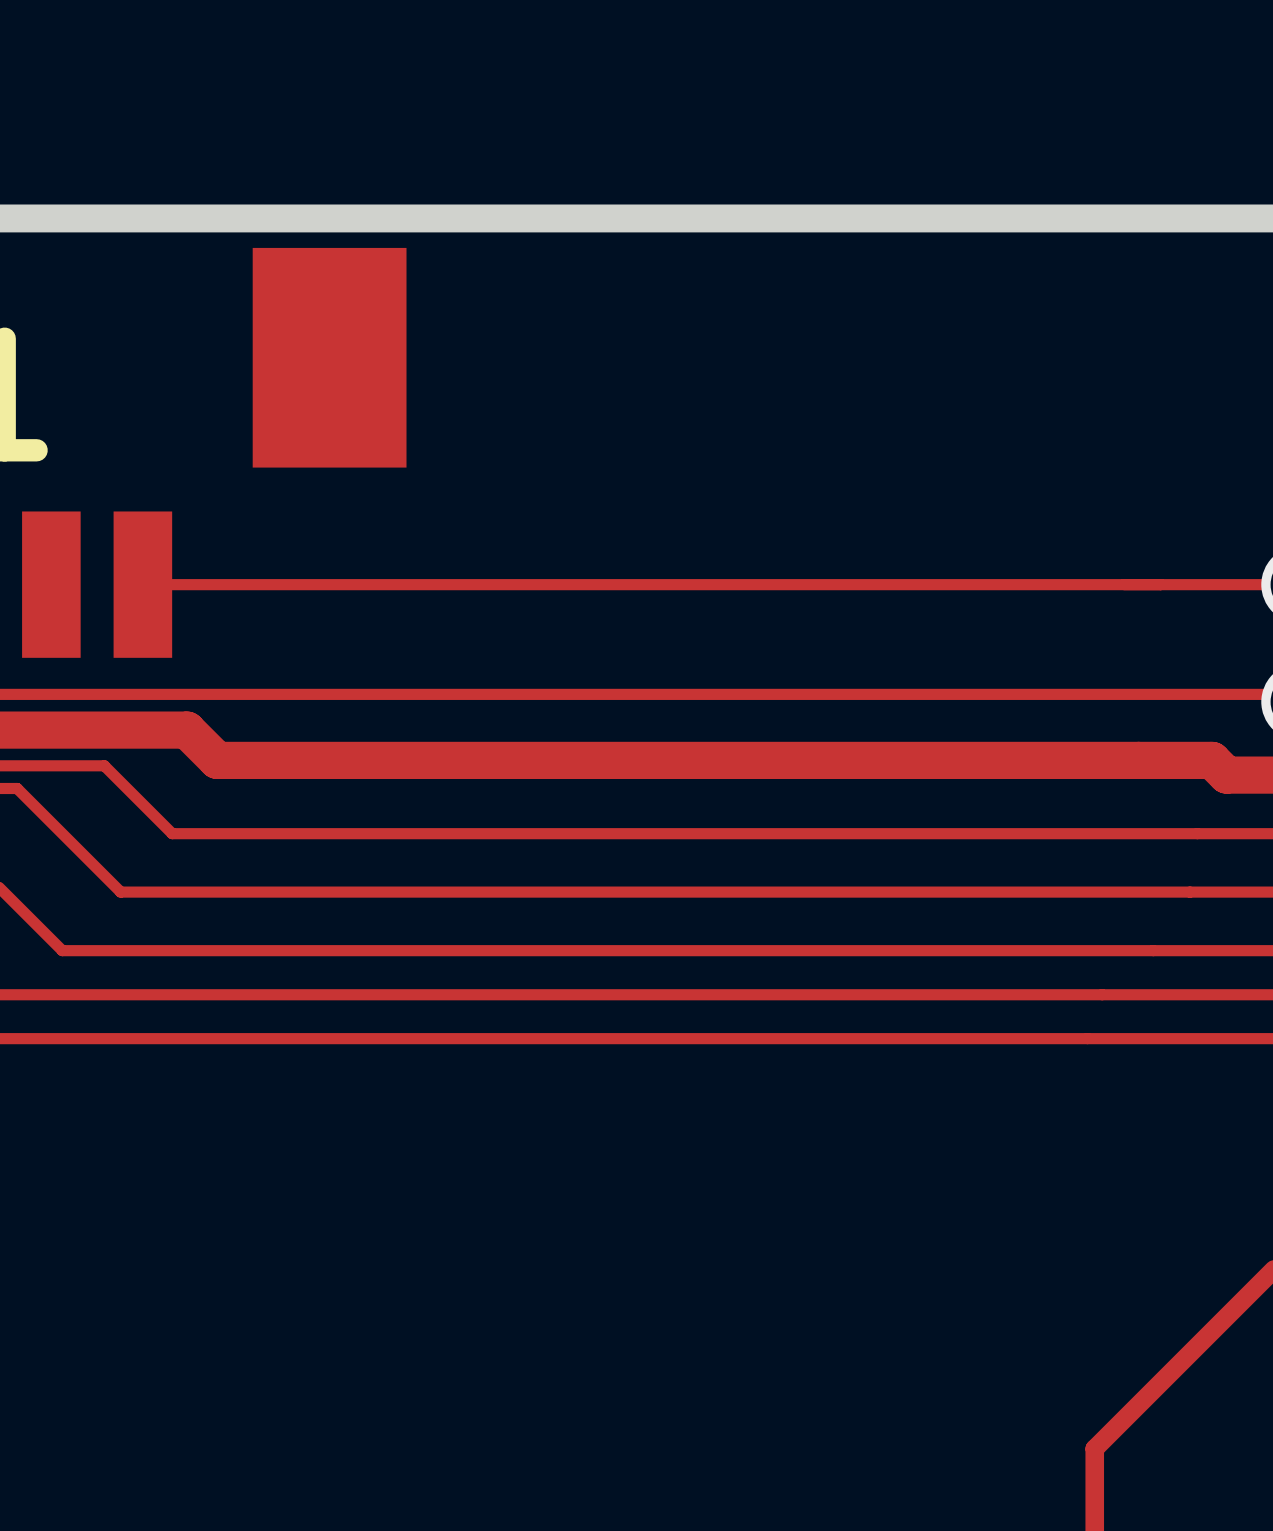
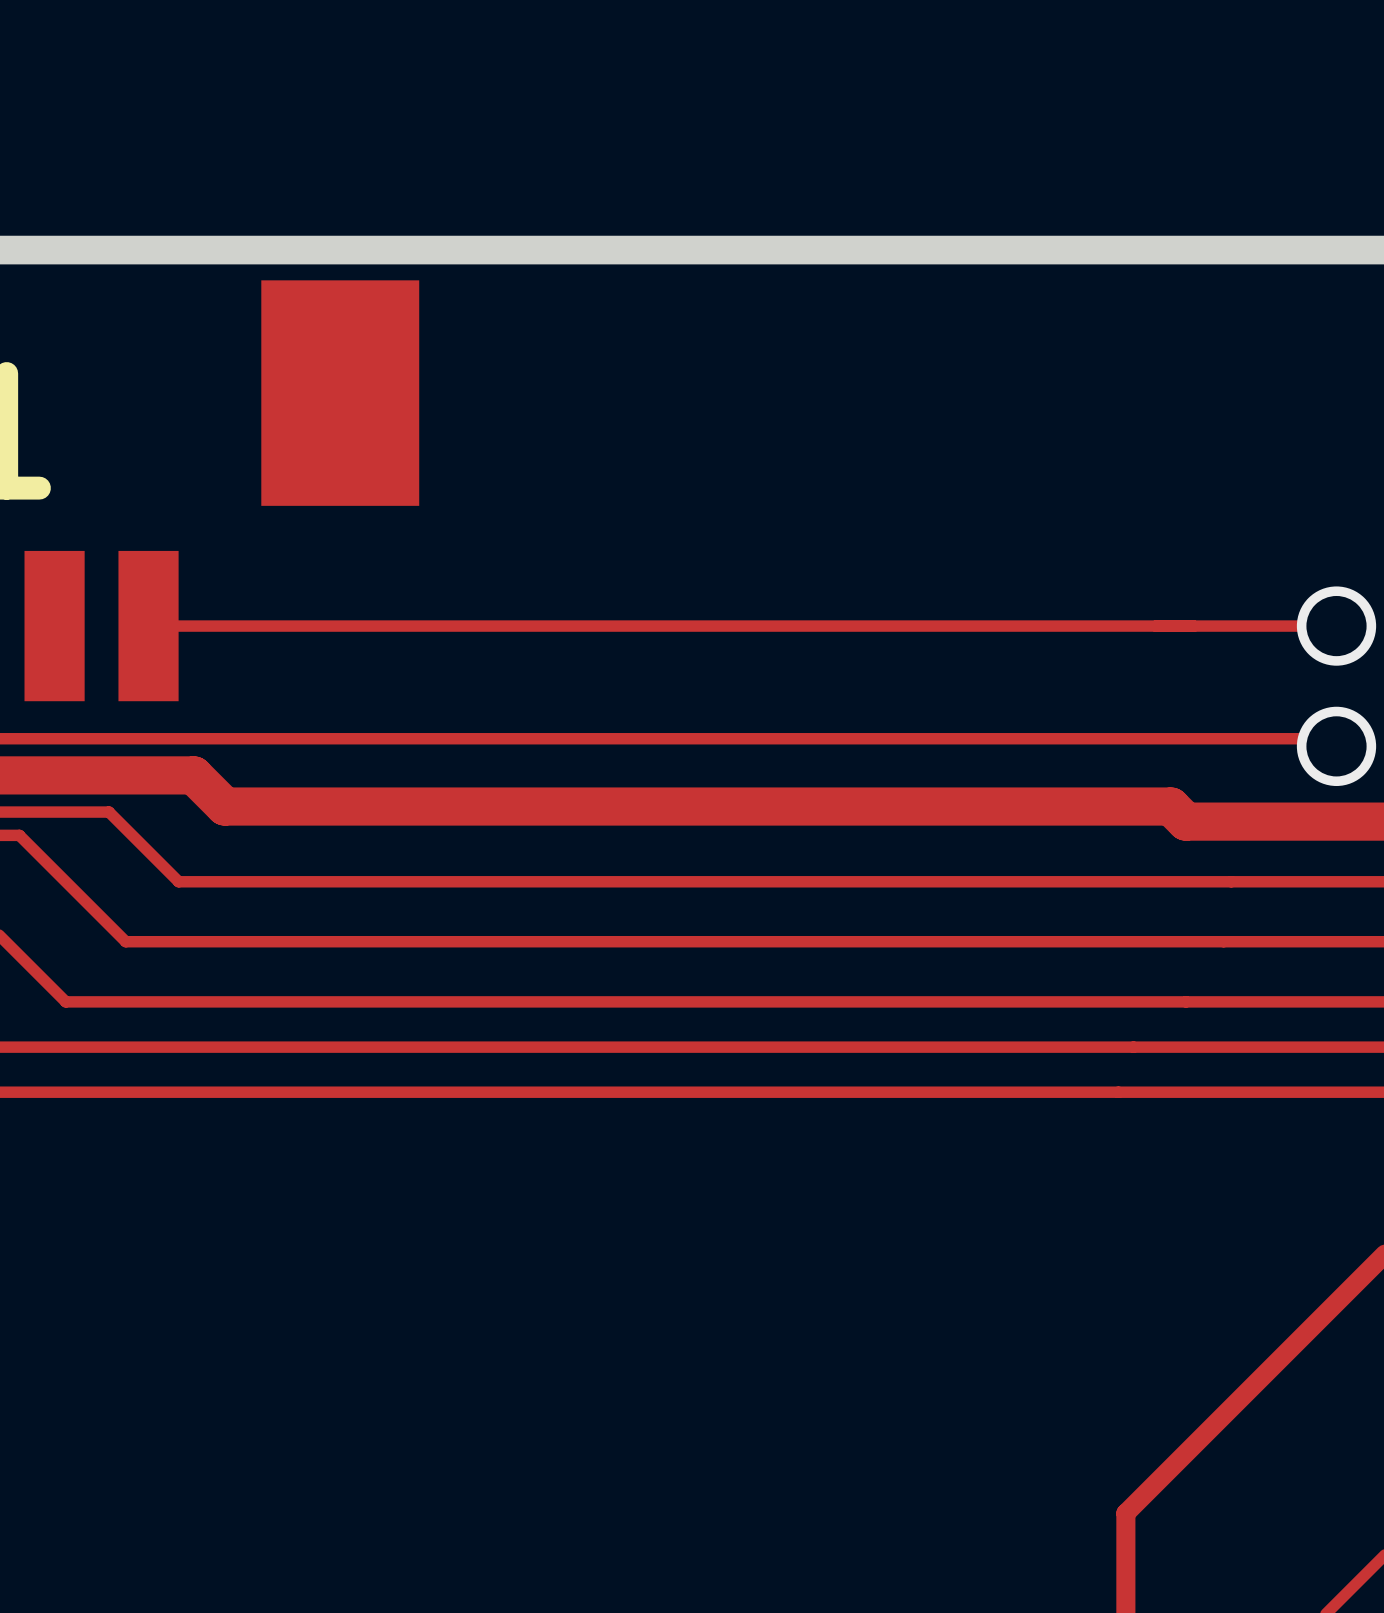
track: (1138, 760) (1212, 760) (1226, 775) -> (1170, 806) (1186, 821) (1261, 821)

